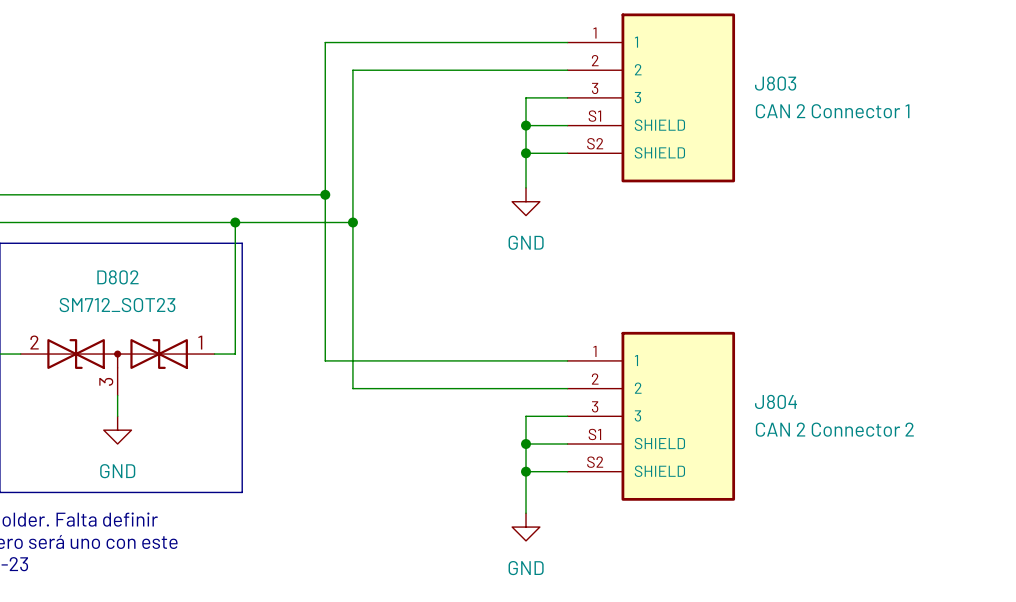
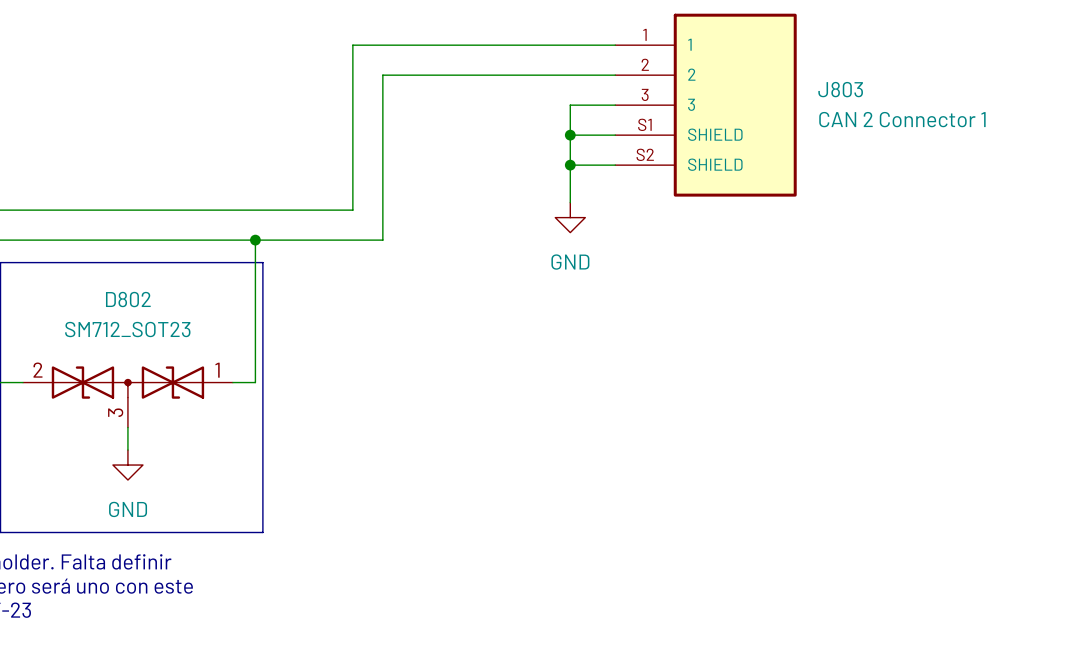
wire: (325, 194) (325, 360) (567, 360) -> none
junction: (325, 194) -> none
wire: (352, 222) (352, 388) (567, 388) -> none
junction: (352, 222) -> none
wire: (567, 416) (526, 416) (526, 513) -> none
J804: CAN 2 Connector 2 (651, 416) -> none
wire: (526, 444) (567, 444) -> none
junction: (526, 444) -> none
wire: (526, 471) (567, 471) -> none
junction: (526, 471) -> none
power symbol: GND (526, 527) -> none

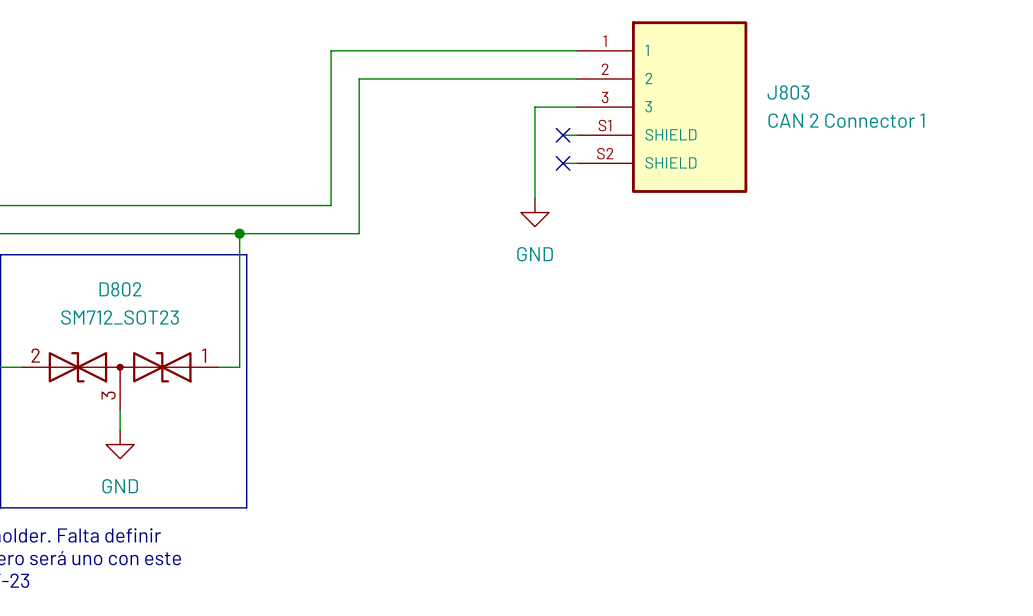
wire: (570, 135) (600, 135) -> none
junction: (570, 135) -> none
no-connect mark: none -> (563, 135)
wire: (570, 165) (600, 165) -> none
junction: (570, 165) -> none
no-connect mark: none -> (563, 163)

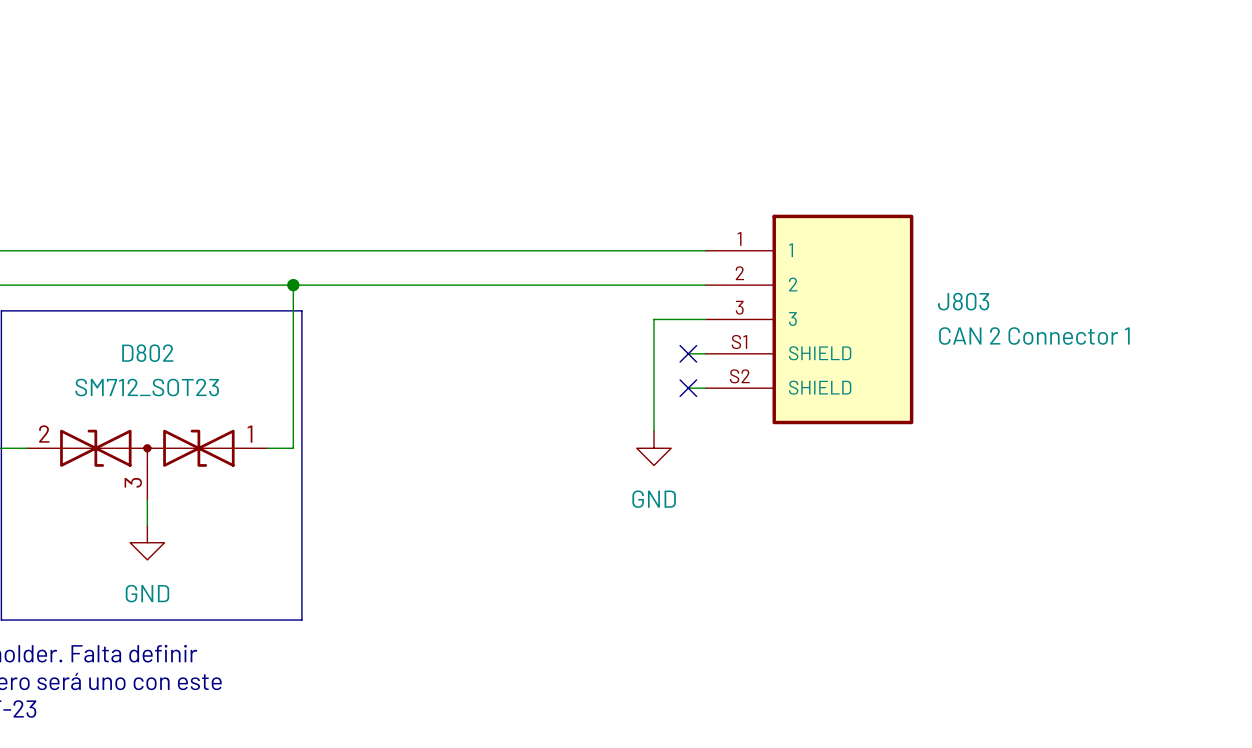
wire: (577, 50) (331, 50) (331, 205) -> (705, 250) (404, 250)
wire: (577, 78) (359, 78) (359, 233) -> (705, 285) (439, 285)
wire: (577, 107) (534, 107) (534, 198) -> (705, 319) (654, 319) (654, 431)
J803 position: (662, 107) -> (809, 319)
wire: (563, 135) (577, 135) -> (688, 388) (705, 388)
no-connect mark: (563, 135) -> none
wire: (563, 163) (577, 163) -> (688, 353) (705, 353)
no-connect mark: (563, 163) -> none
power symbol position: GND (534, 212) -> GND (654, 448)
no-connect mark: none -> (688, 353)
no-connect mark: none -> (688, 388)

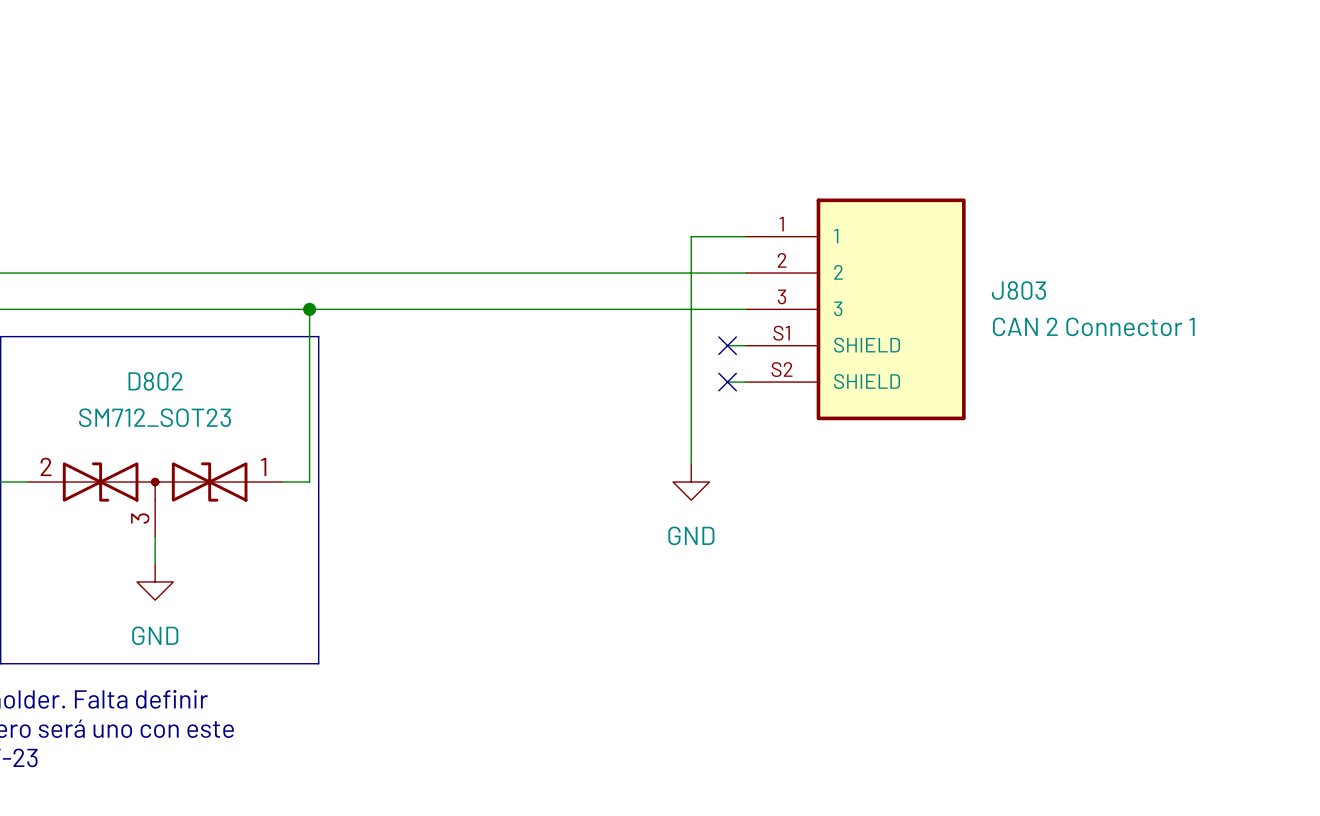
wire: (654, 319) (688, 319) -> (691, 345) (691, 236) (745, 236)
J803 position: (809, 319) -> (855, 309)
wire: (688, 388) (705, 388) -> none
no-connect mark position: (688, 388) -> (727, 345)

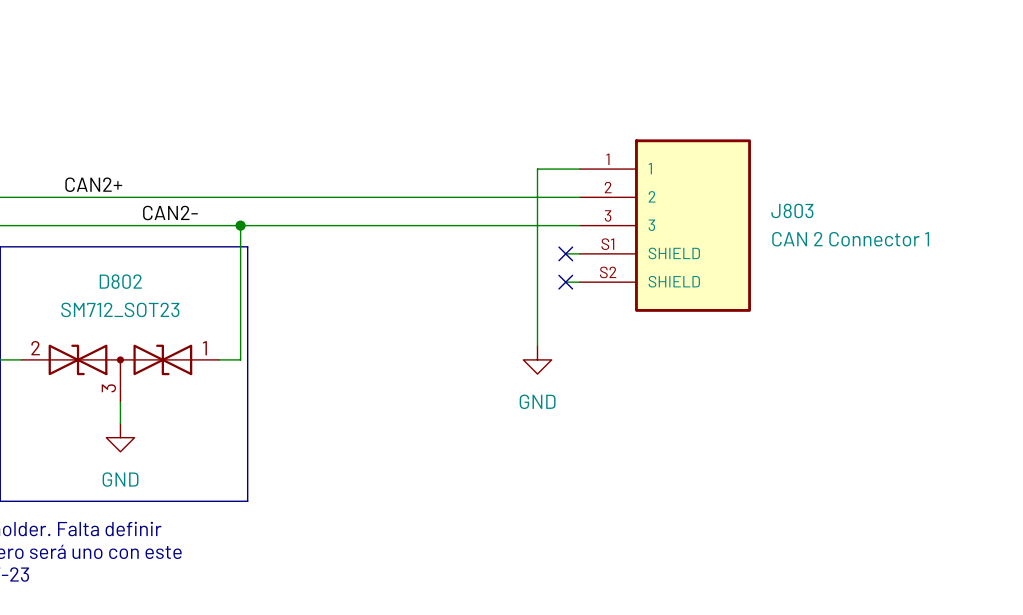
label: none -> CAN2+ (93, 184)
label: none -> CAN2- (170, 213)

